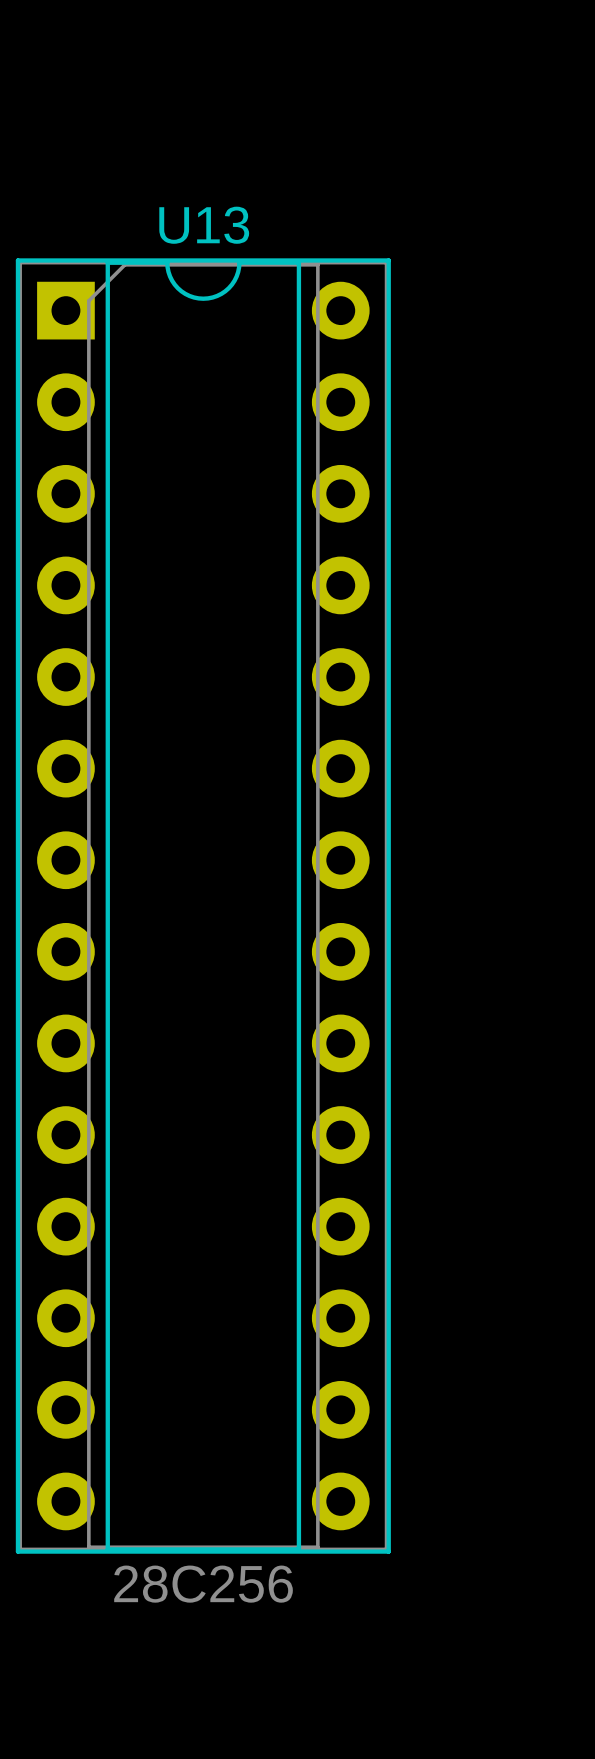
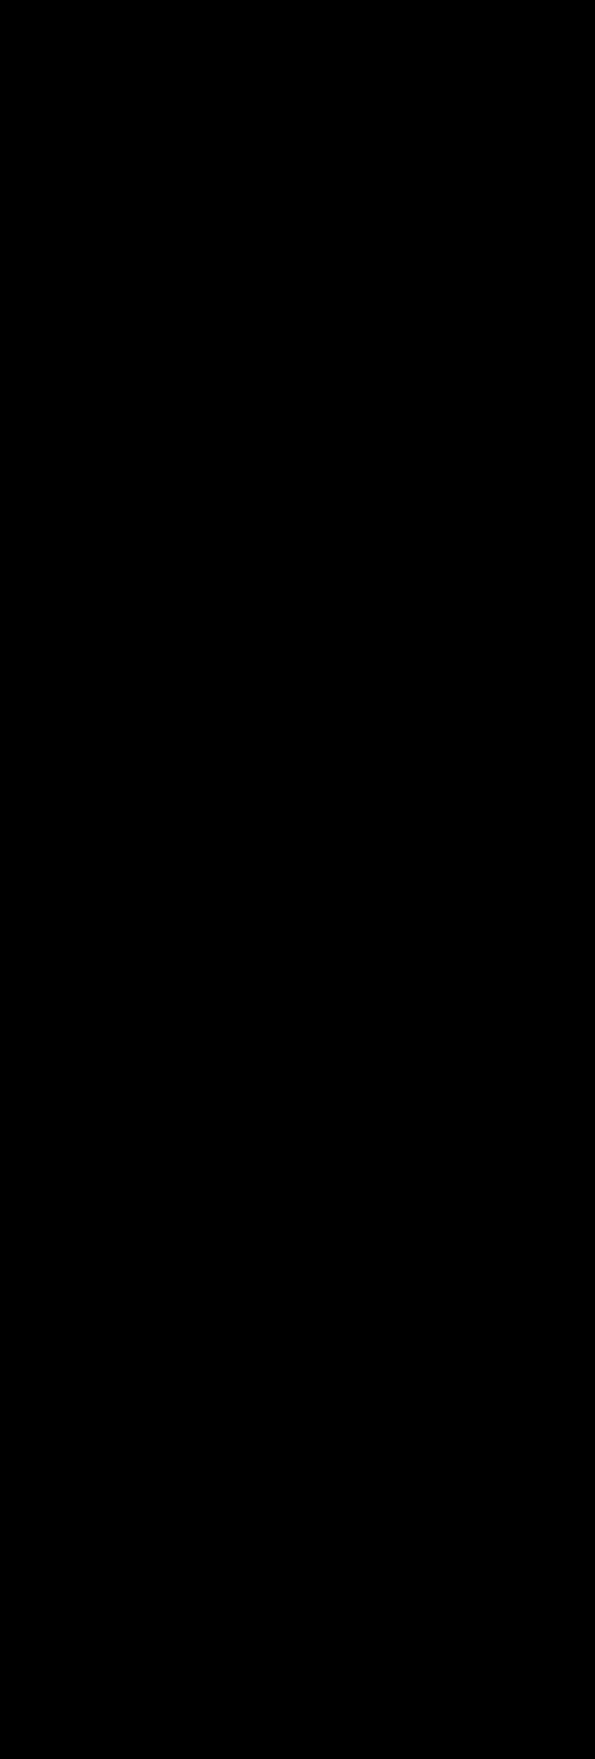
U13: 28C256 (203, 906) -> none

